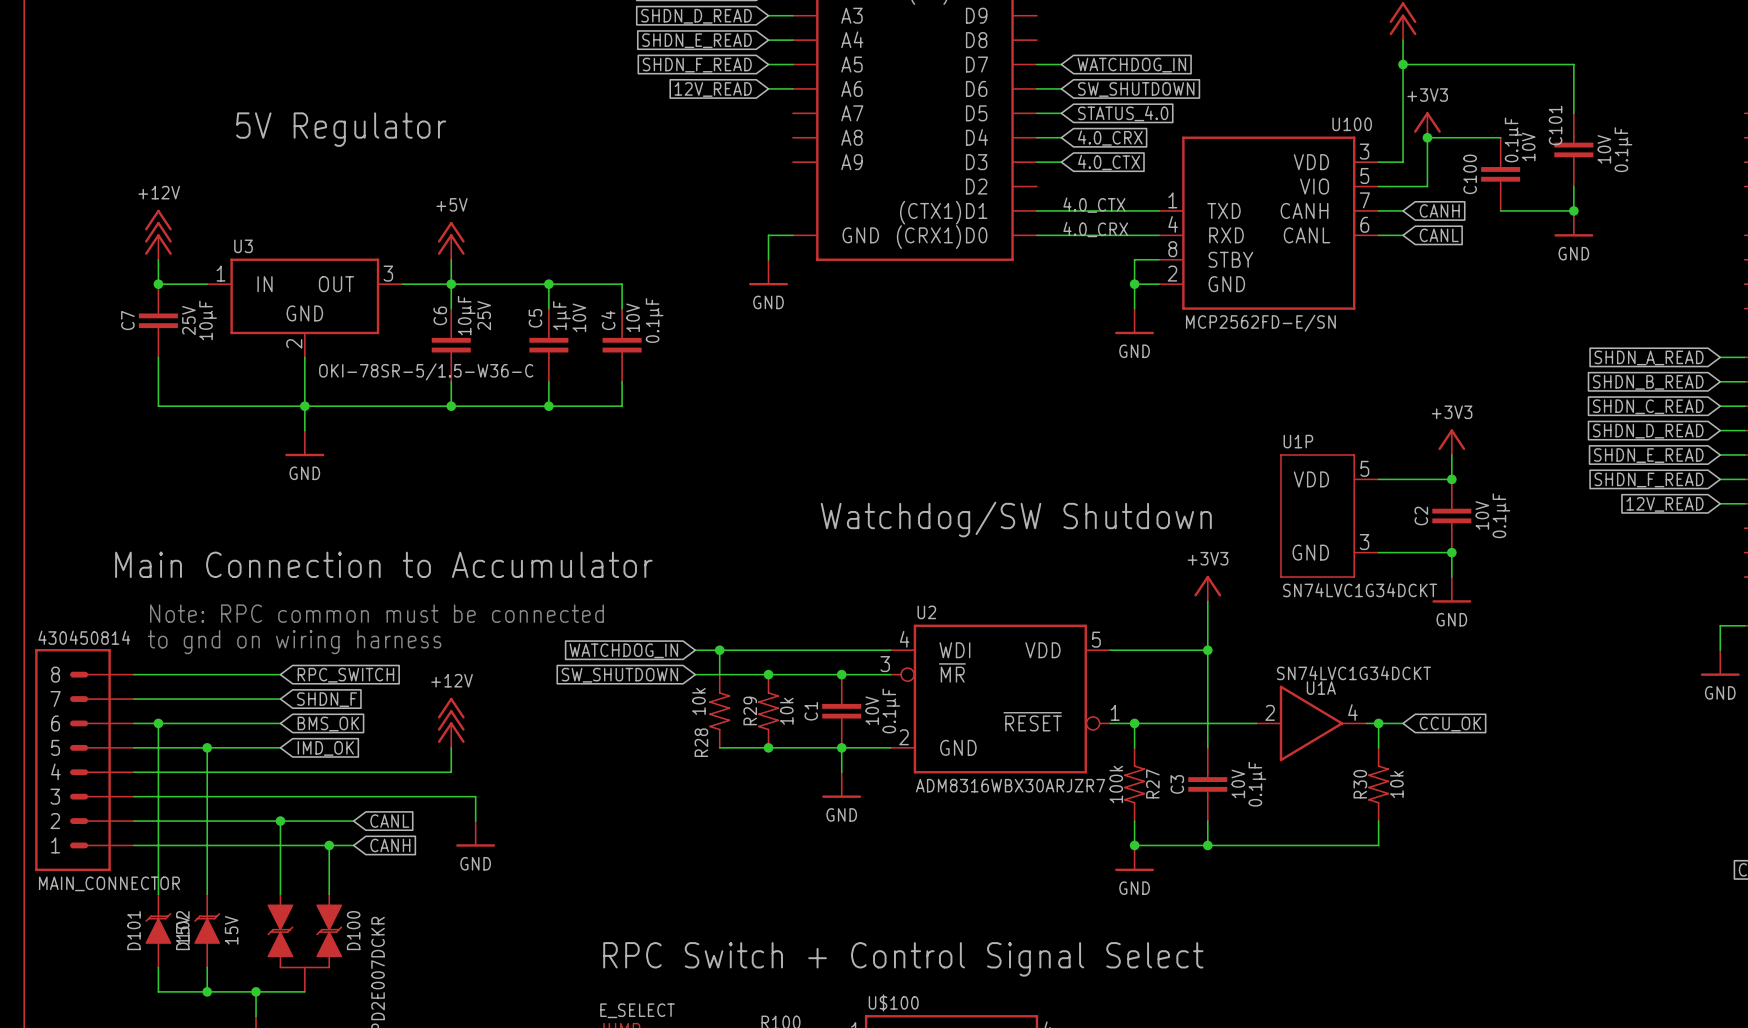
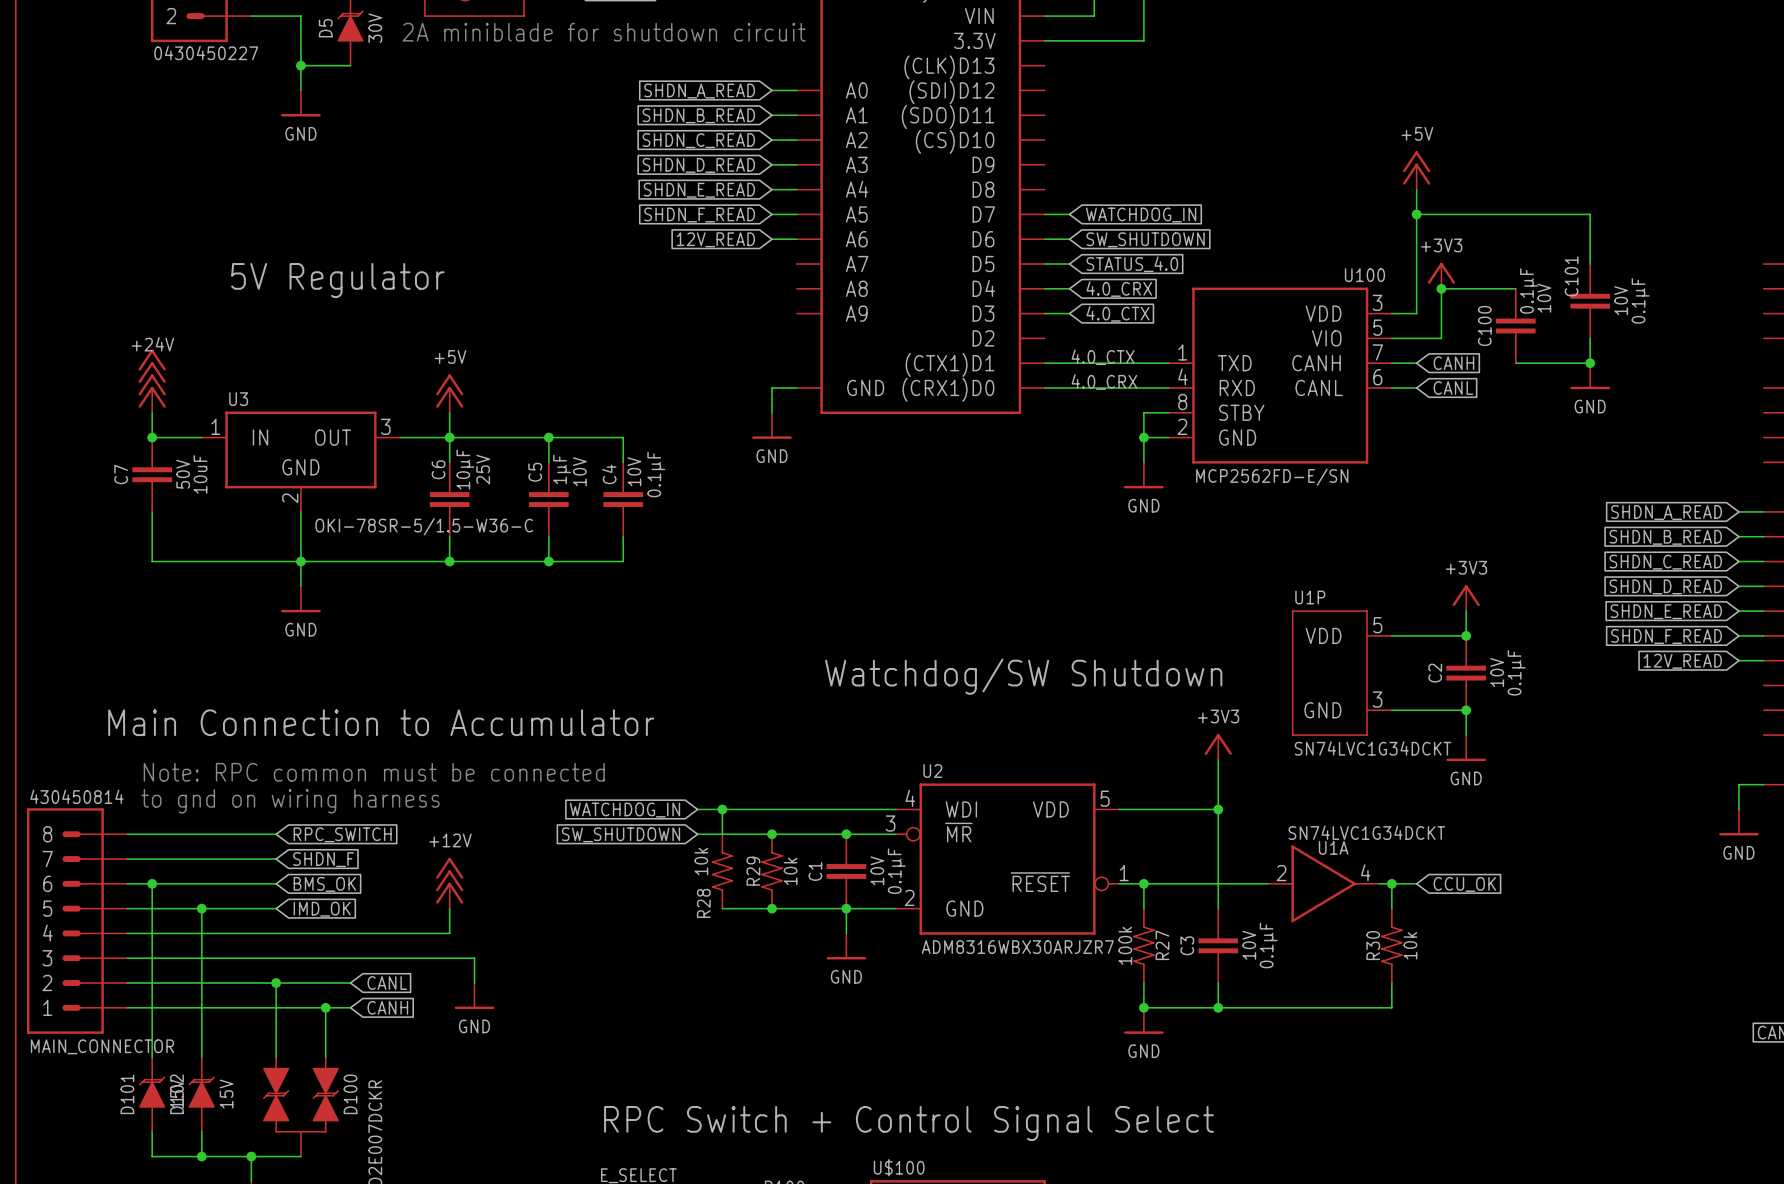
power symbol: +12V (158, 234) -> +24V (152, 381)
C7 text: 25V (188, 320) -> 50V (183, 474)
C7 text: 10µF (208, 320) -> 10uF (200, 474)

